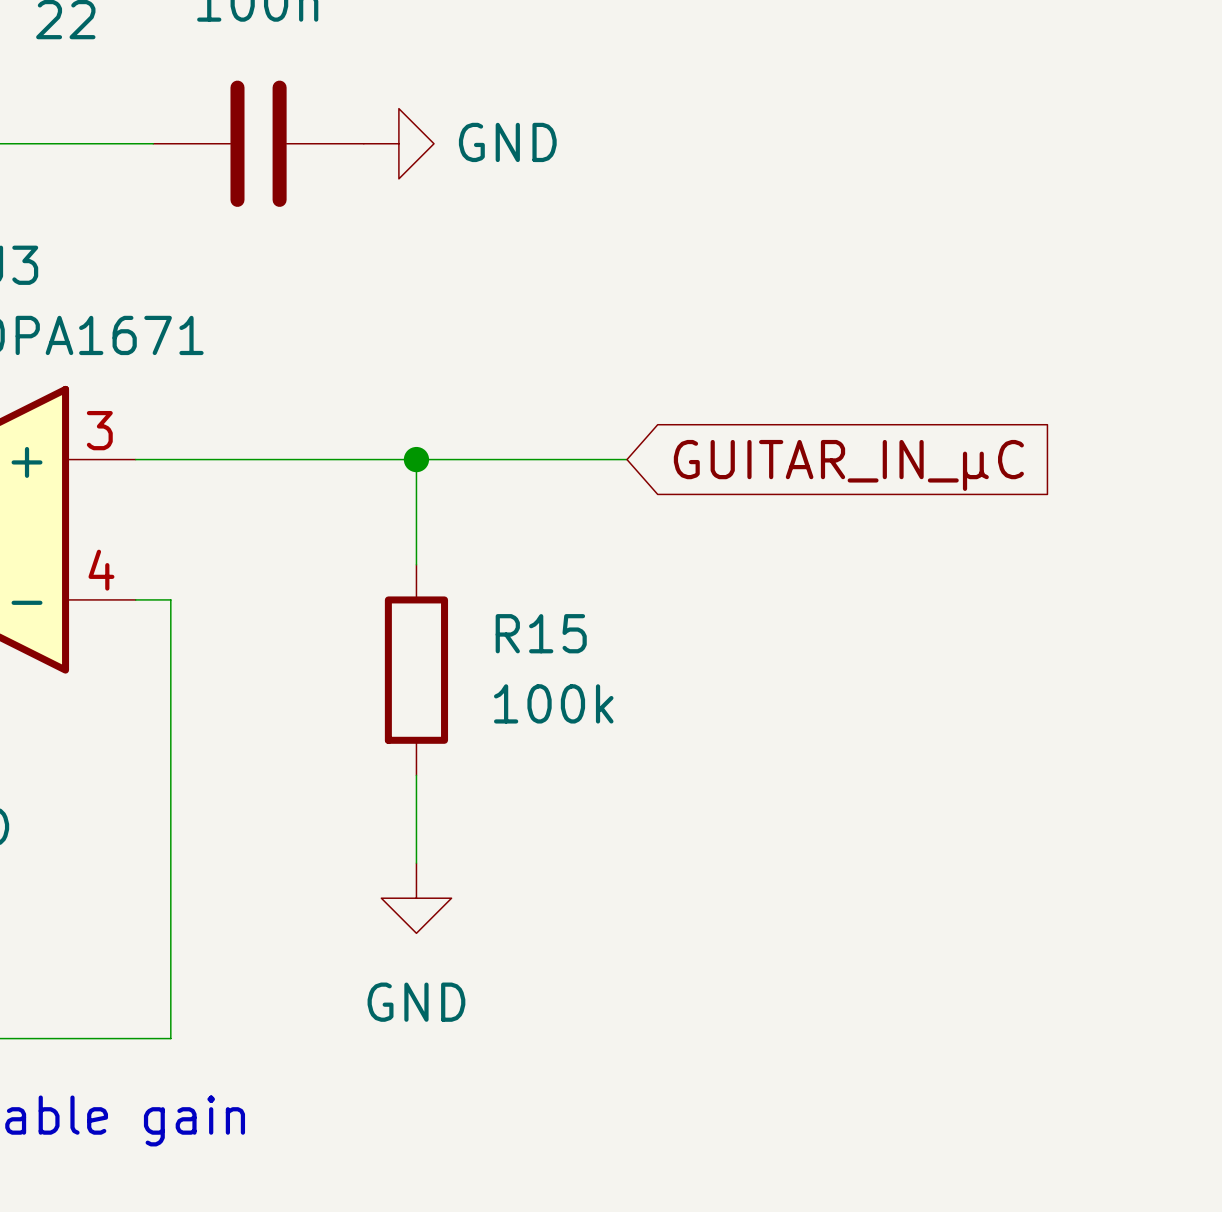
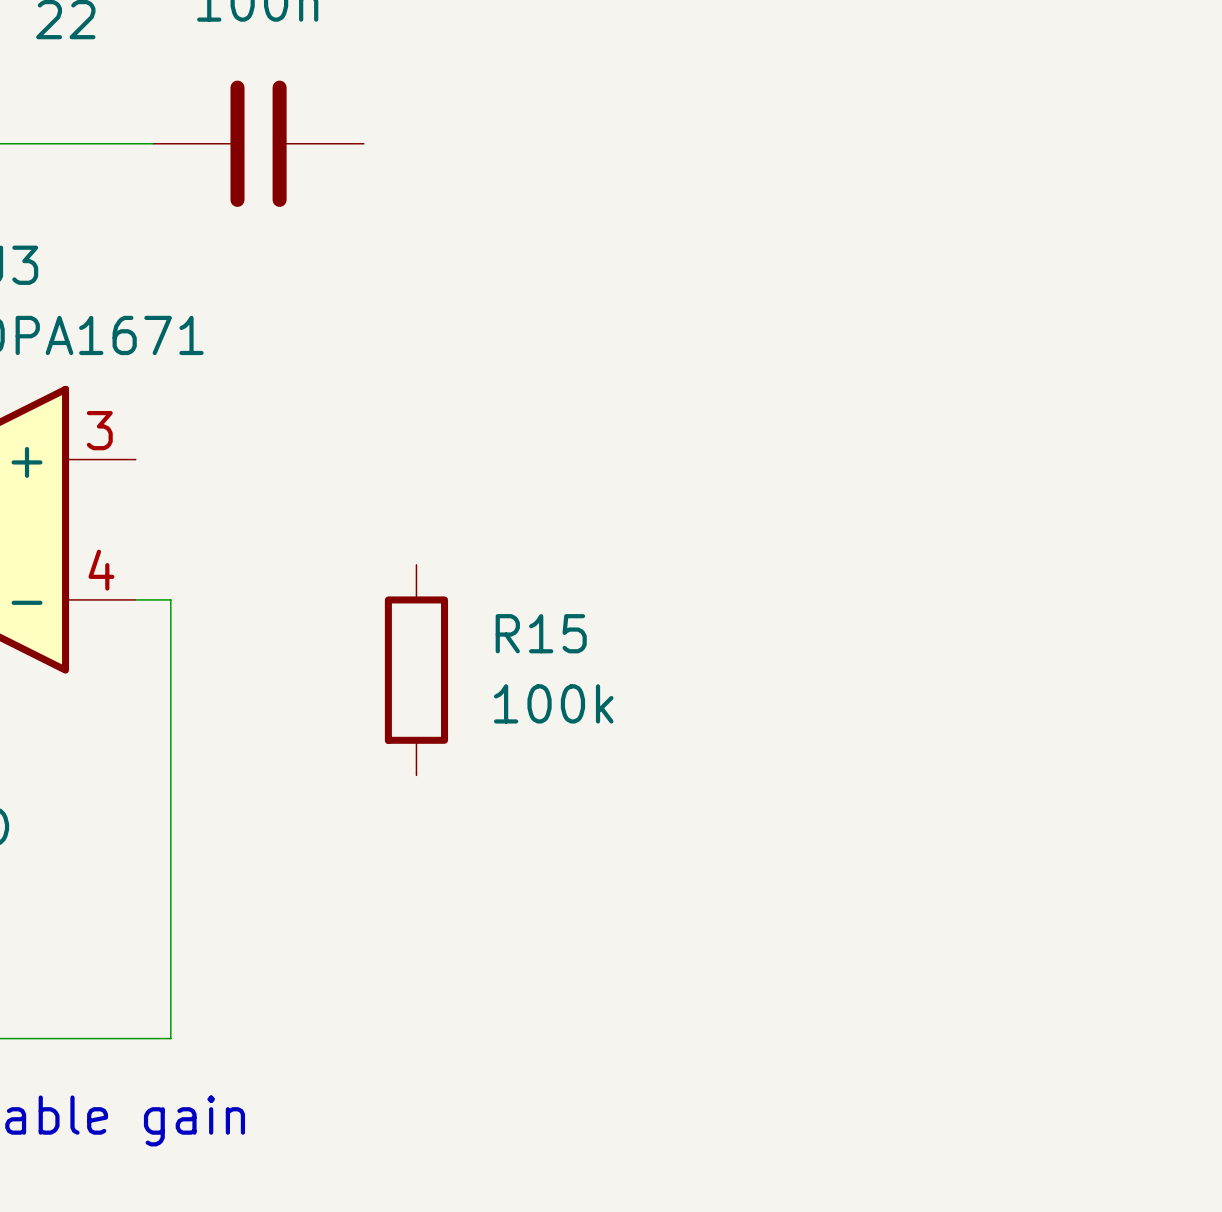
power symbol: GND (398, 143) -> none
wire: (135, 459) (627, 459) -> none
wire: (416, 459) (416, 564) -> none
junction: (416, 459) -> none
global label: GUITAR_IN_µC (848, 465) -> none
wire: (416, 775) (416, 863) -> none
power symbol: GND (416, 898) -> none

